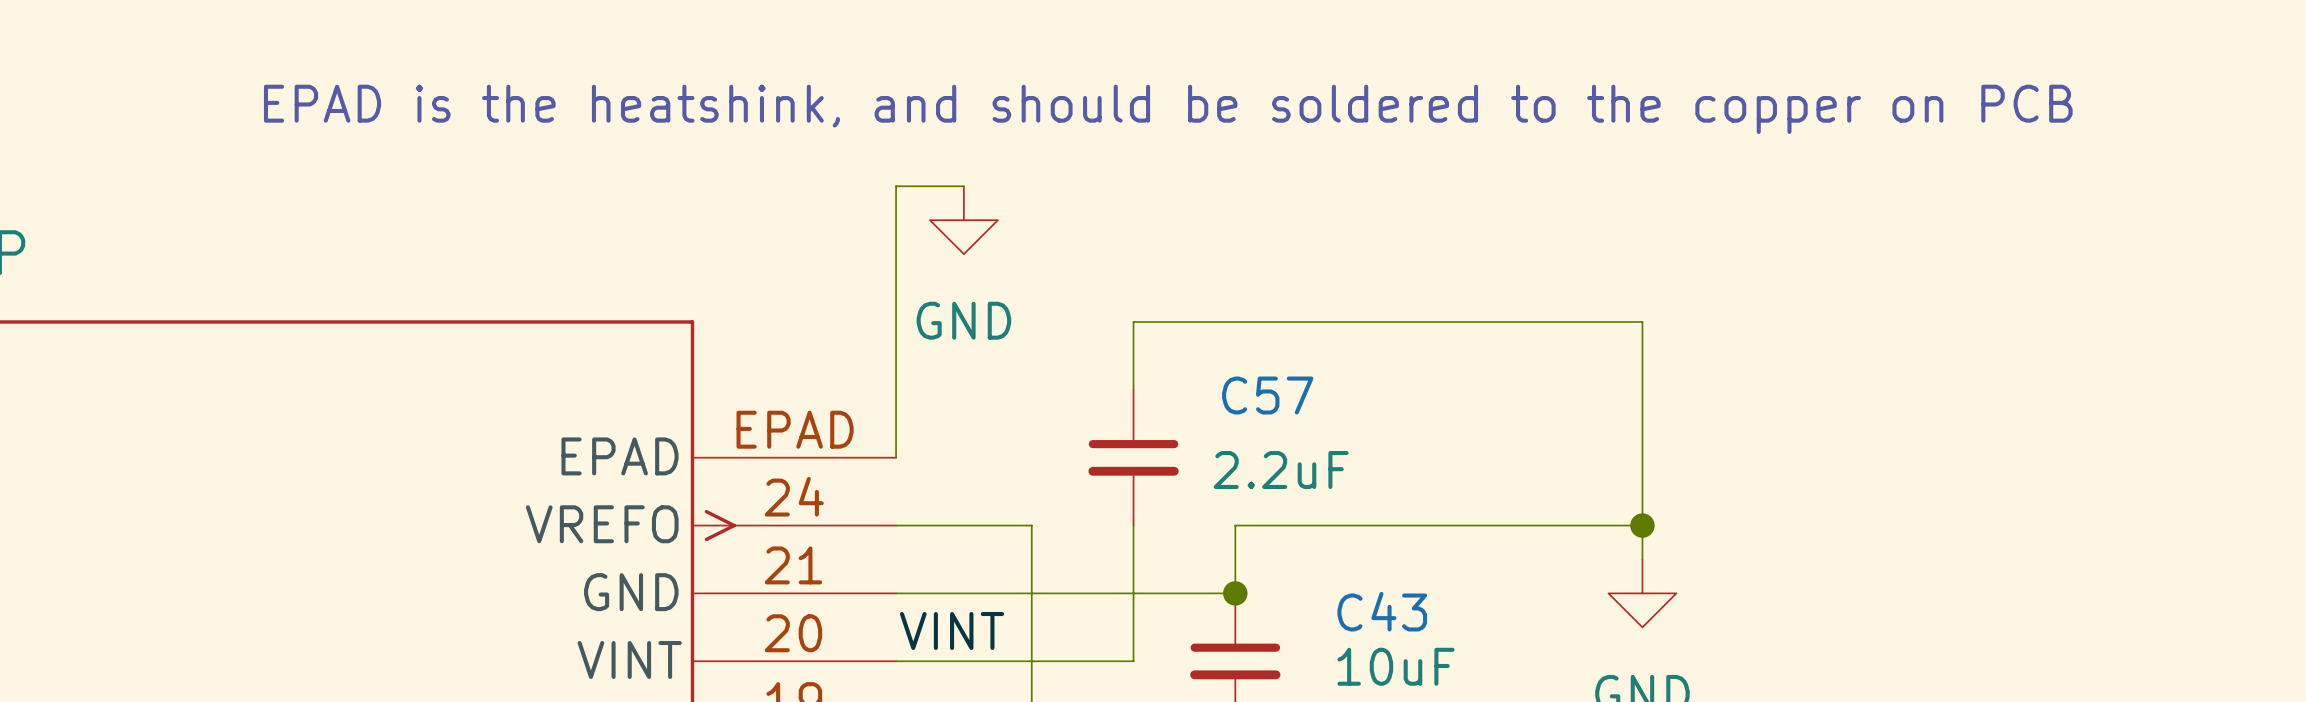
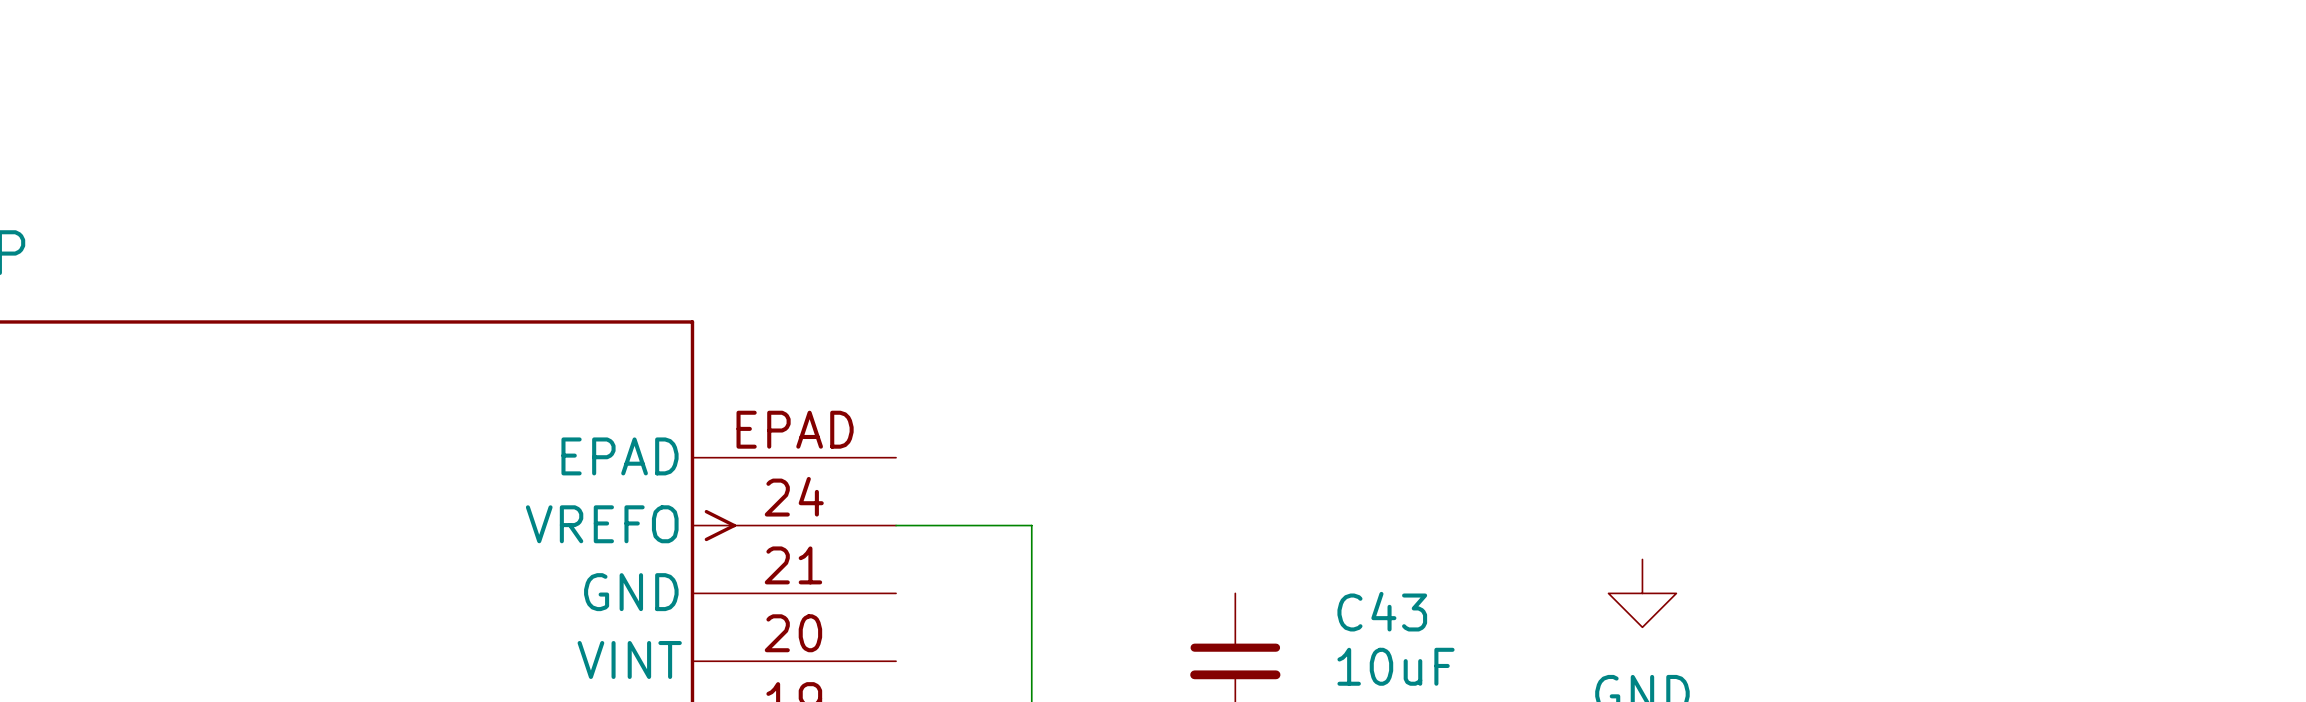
text: EPAD is the heatshink, and should be soldered to the copper on PCB (1168, 109) -> none
wire: (963, 186) (896, 186) (896, 457) -> none
power symbol: GND (963, 220) -> none
wire: (1133, 389) (1133, 321) (1642, 321) (1642, 559) -> none
C57: 2.2uF (1133, 457) -> none
wire: (1133, 525) (1133, 661) (896, 661) -> none
wire: (1642, 525) (1235, 525) (1235, 593) (896, 593) -> none
junction: (1642, 525) -> none
junction: (1235, 593) -> none
label: VINT (952, 630) -> none

